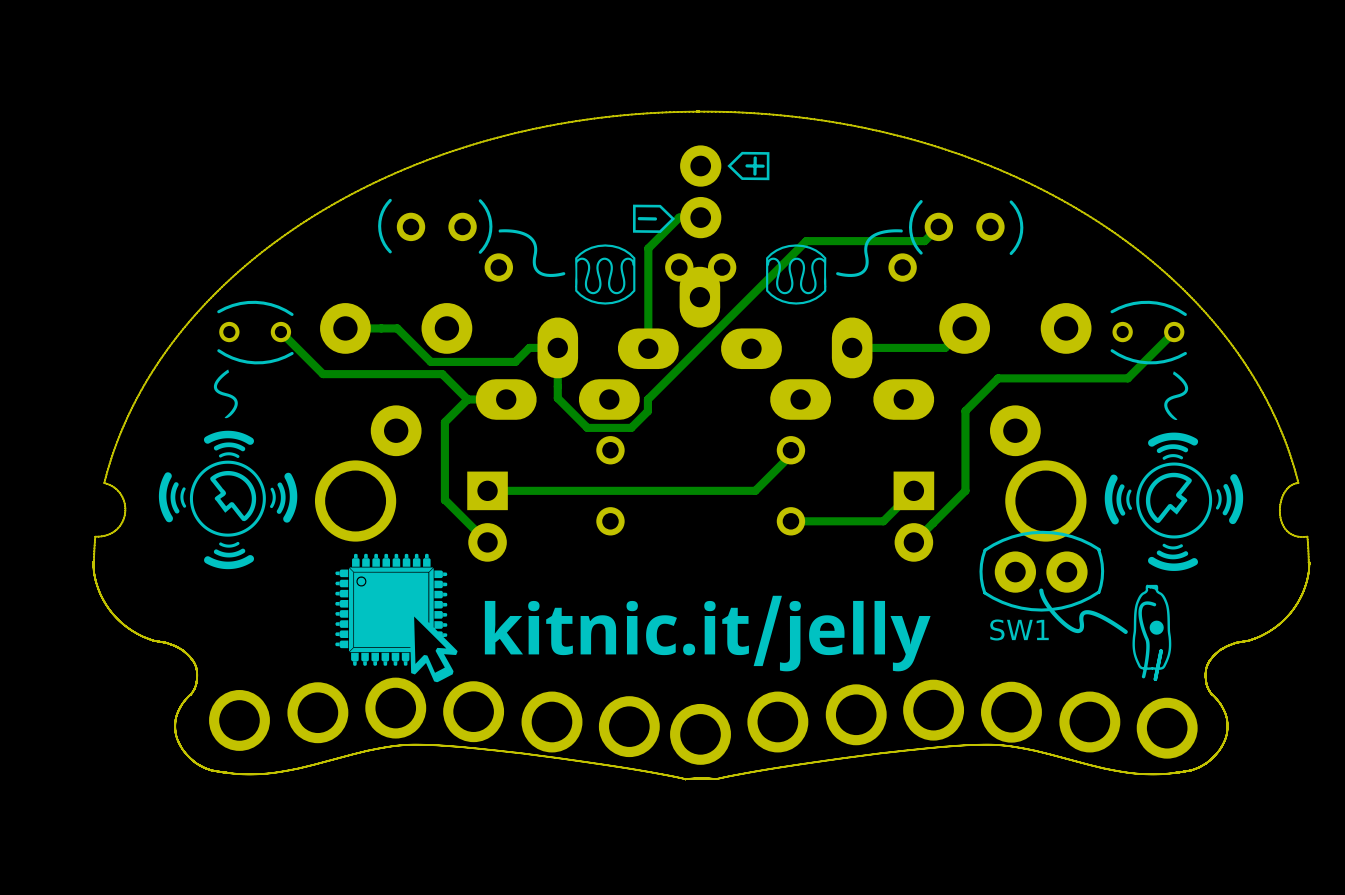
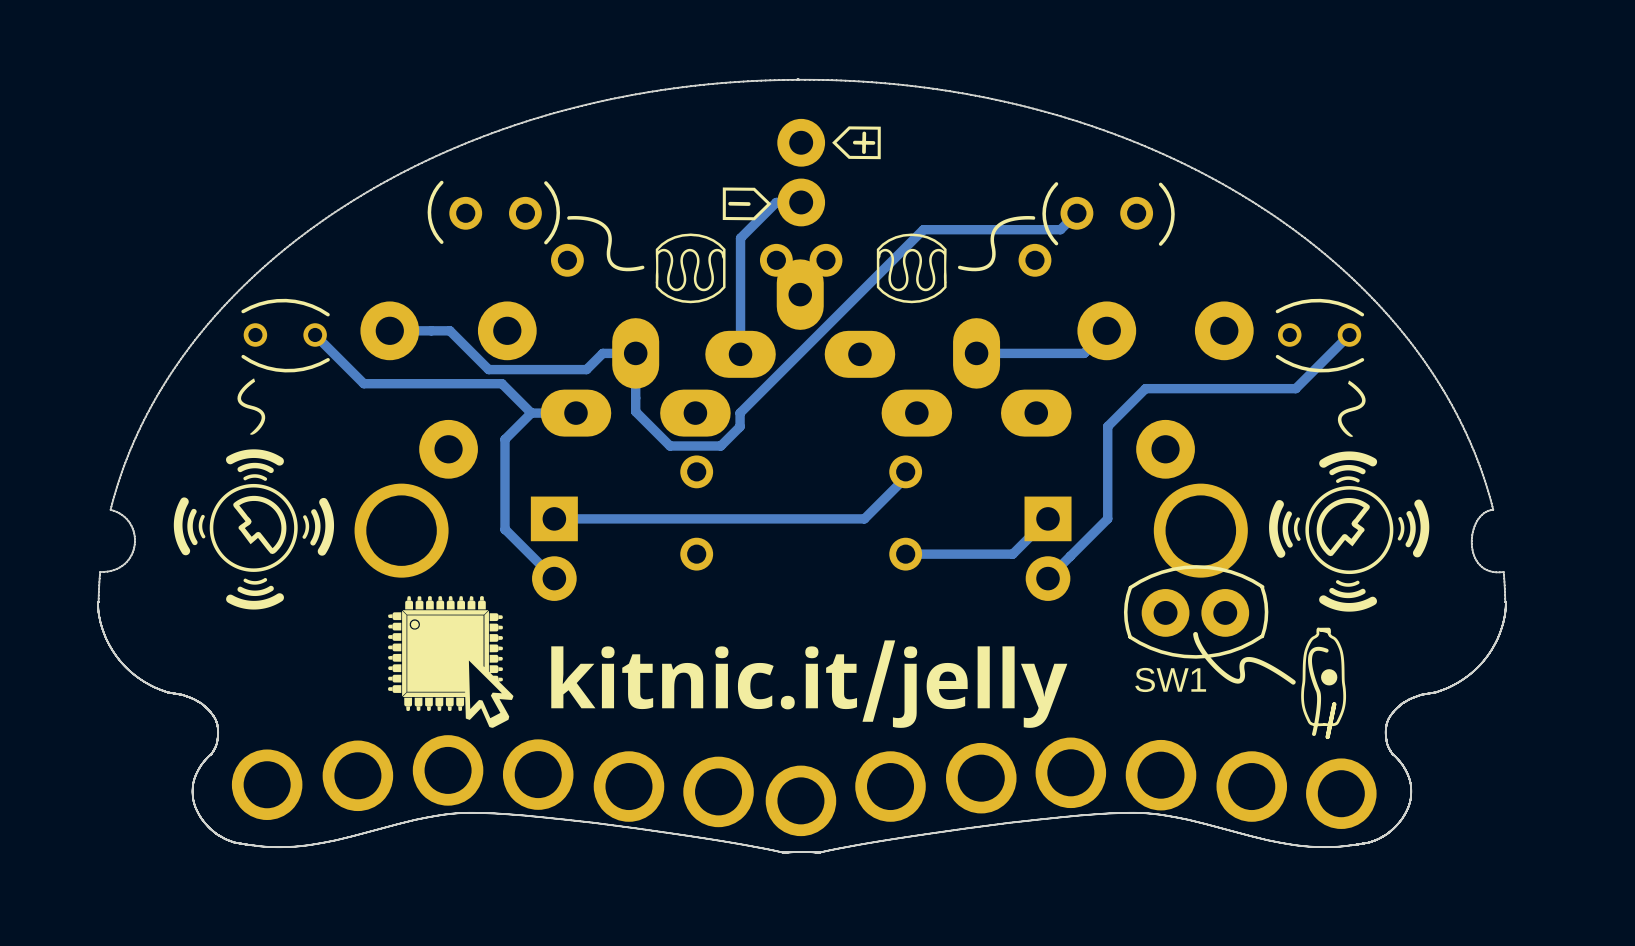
drawing shape: [335, 553, 458, 683] -> [388, 596, 514, 728]

